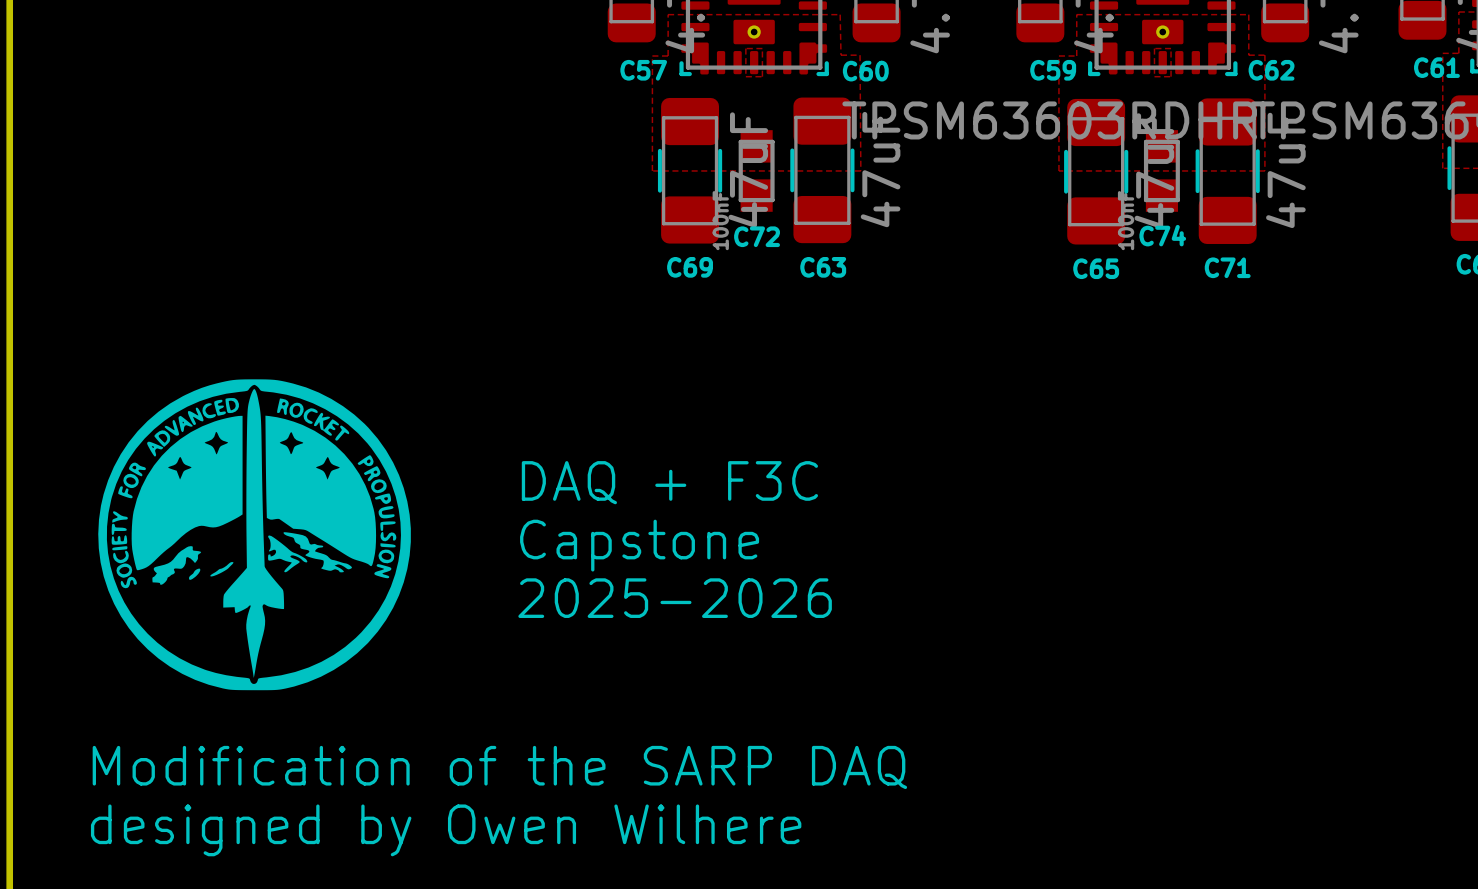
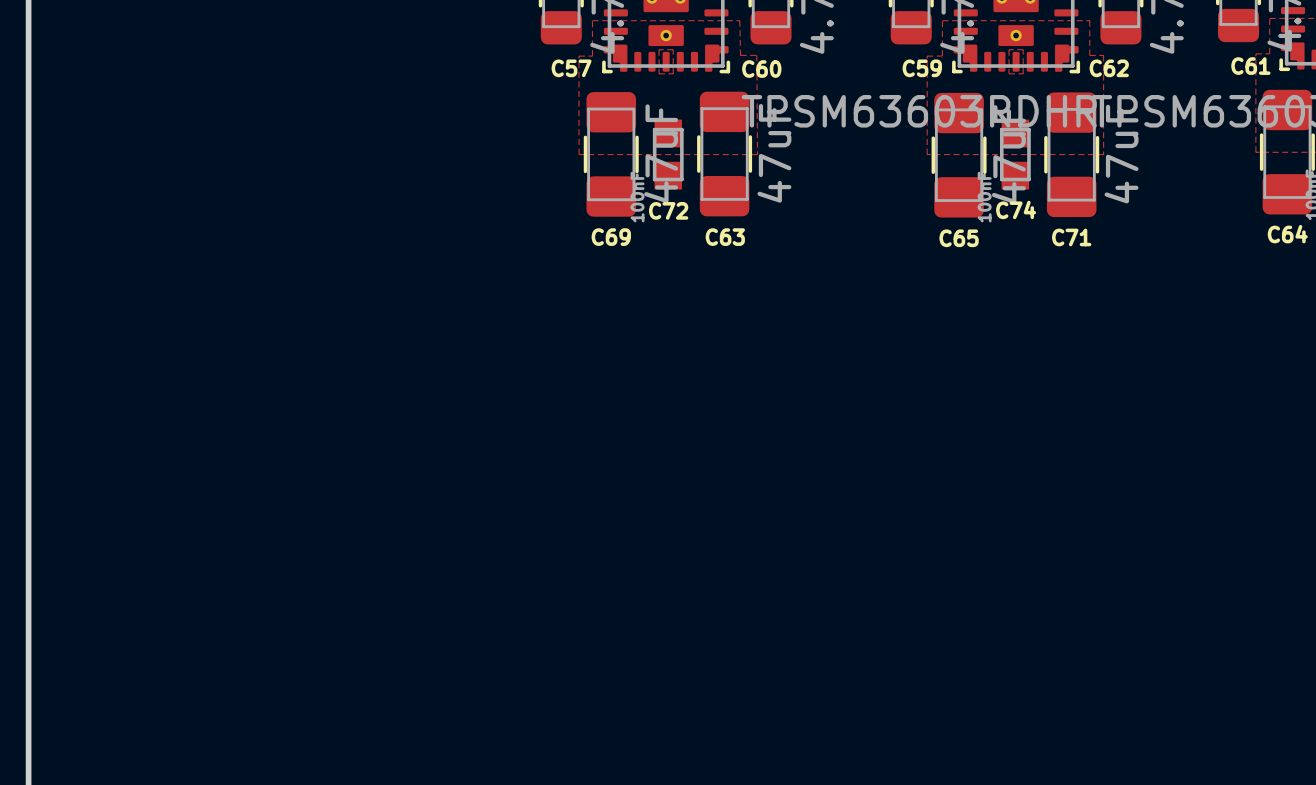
drawing: [98, 379, 411, 691] -> none
text: DAQ + F3C (669, 482) -> none
text: Capstone (639, 545) -> none
text: 2025-2026 (675, 598) -> none
text: Modification of the SARP DAQ (499, 767) -> none
text: designed by Owen Wilhere (446, 830) -> none

